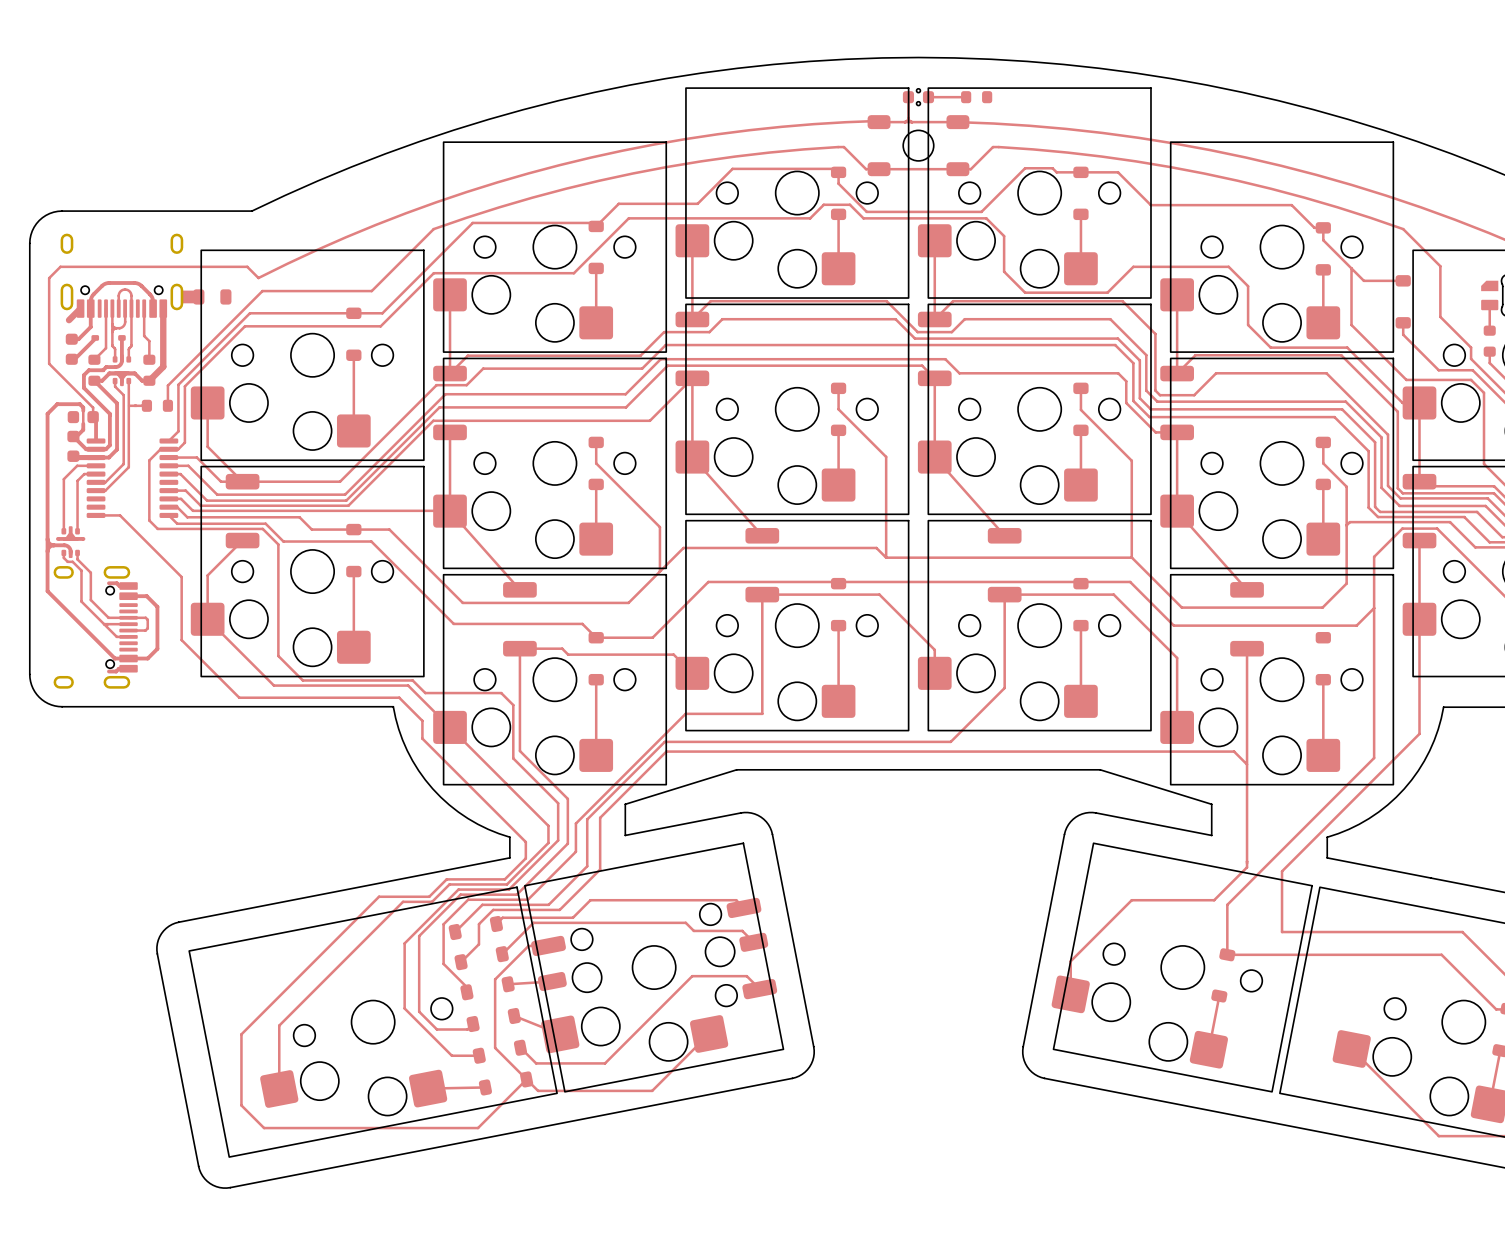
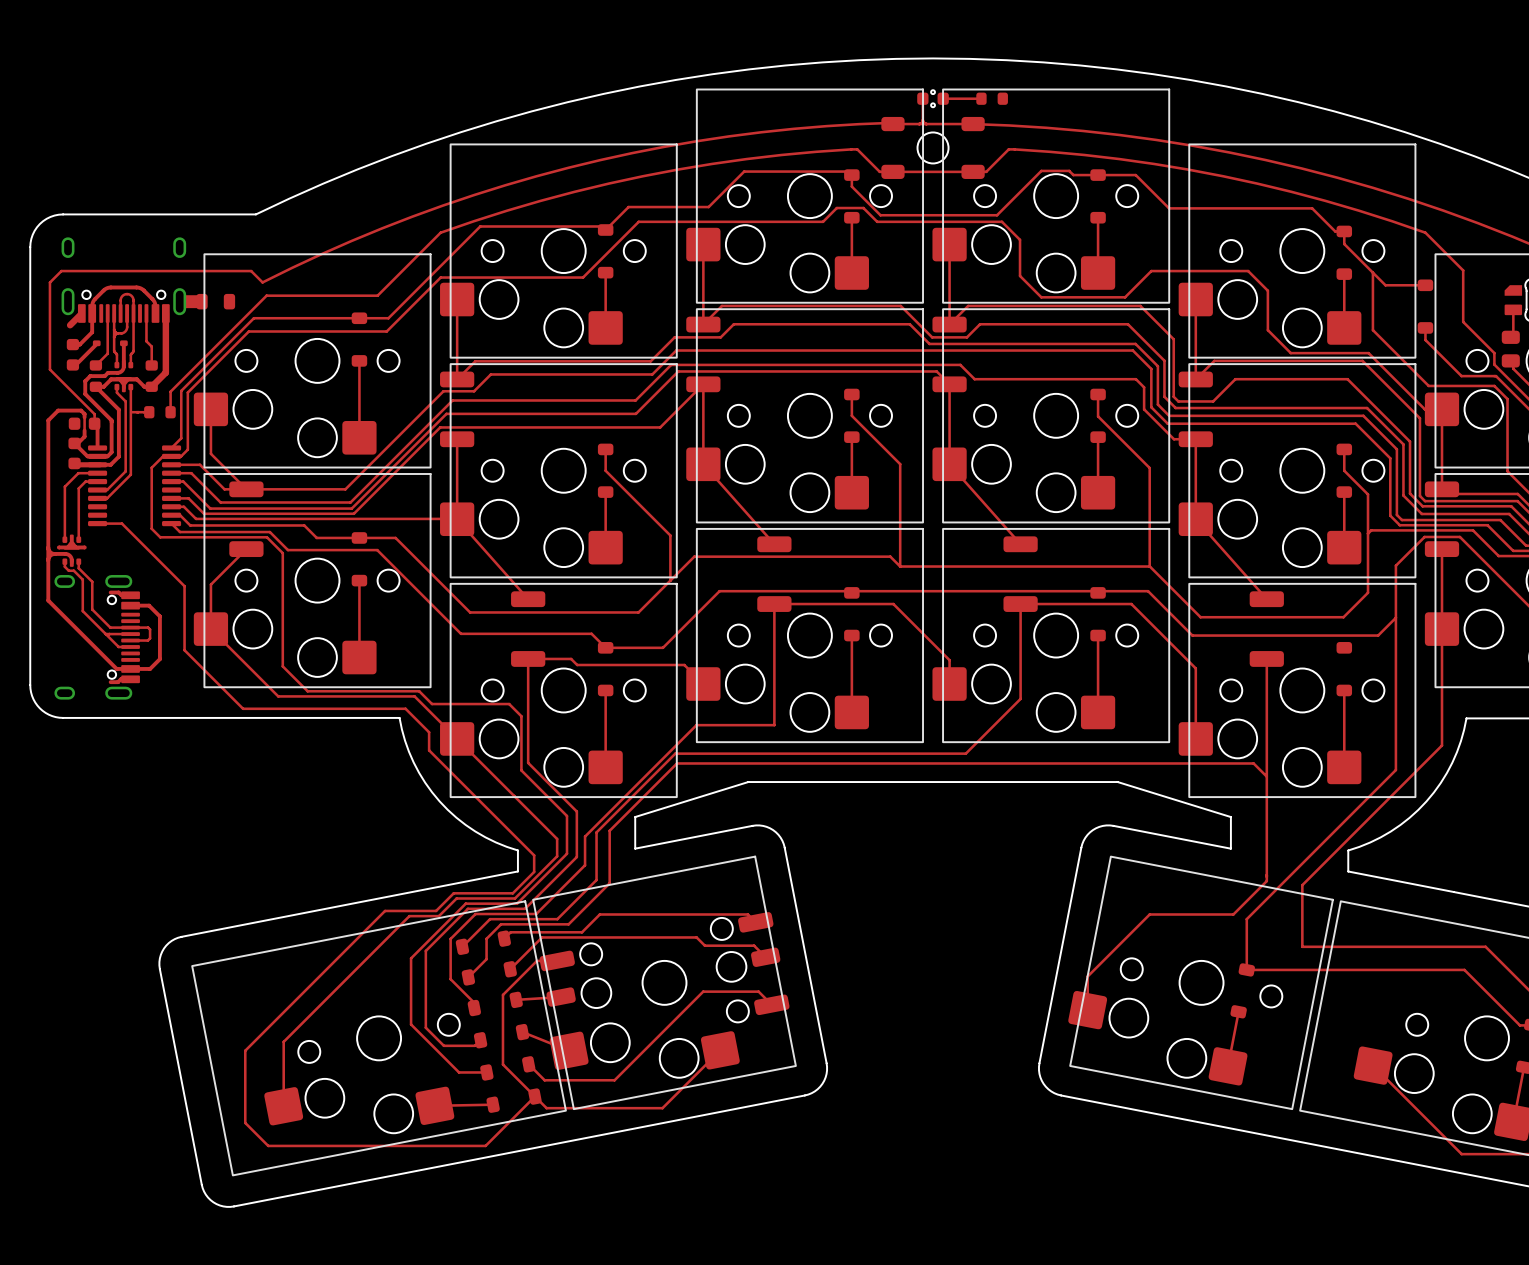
part footprint: [1483, 325, 1496, 357] -> [1501, 330, 1520, 368]

